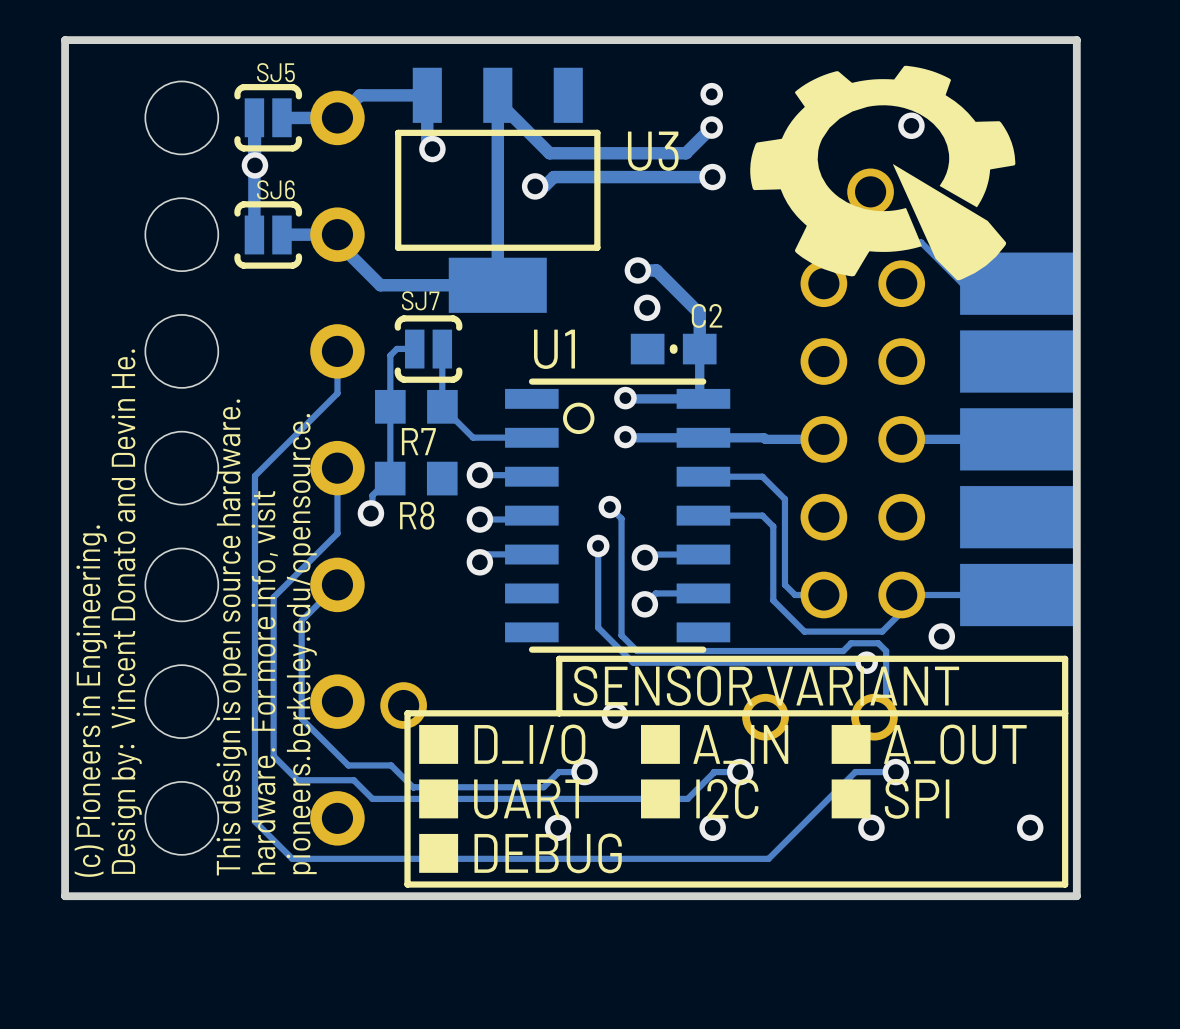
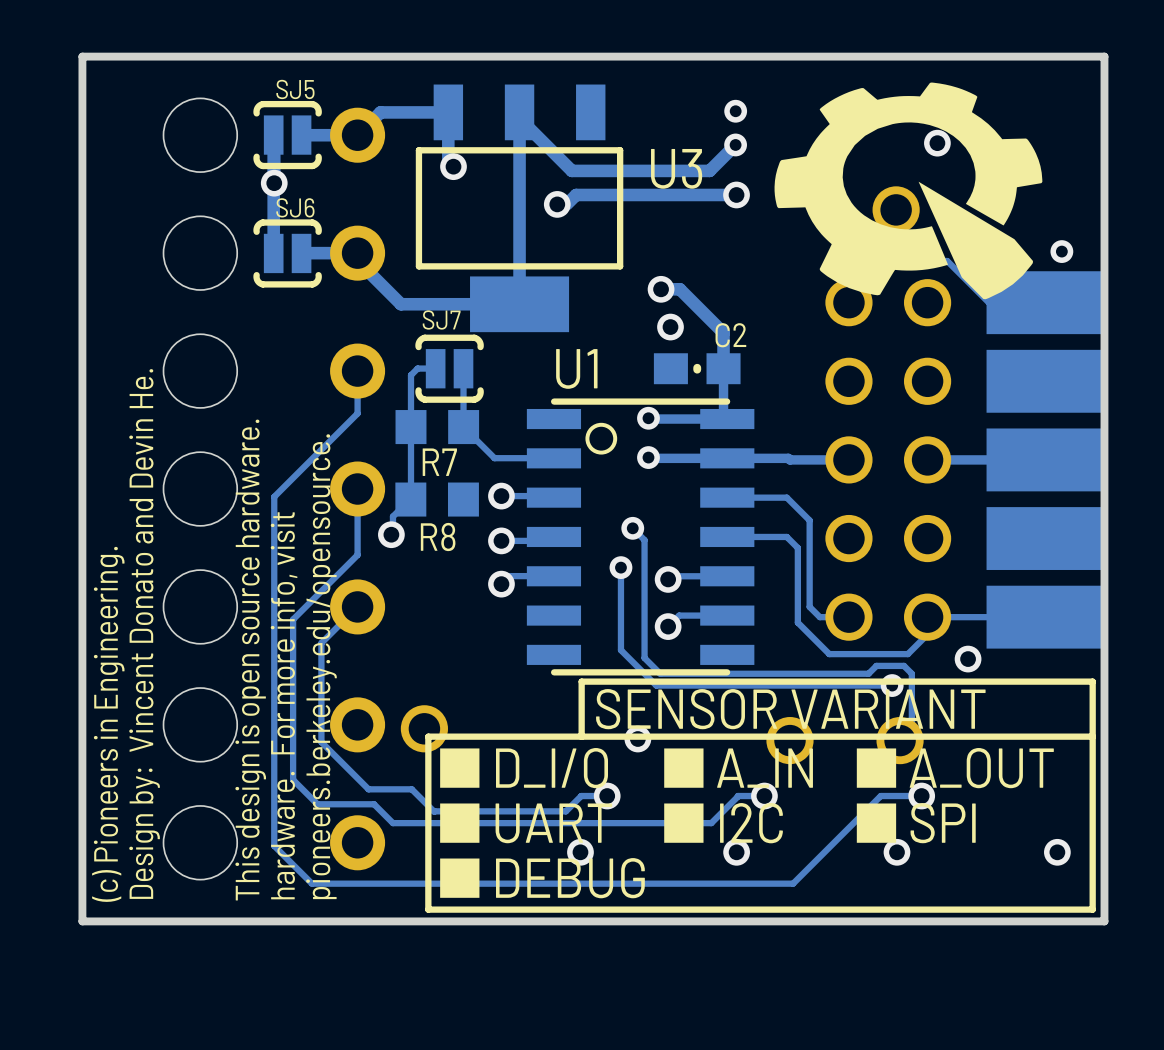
via: none -> (1061, 251)

